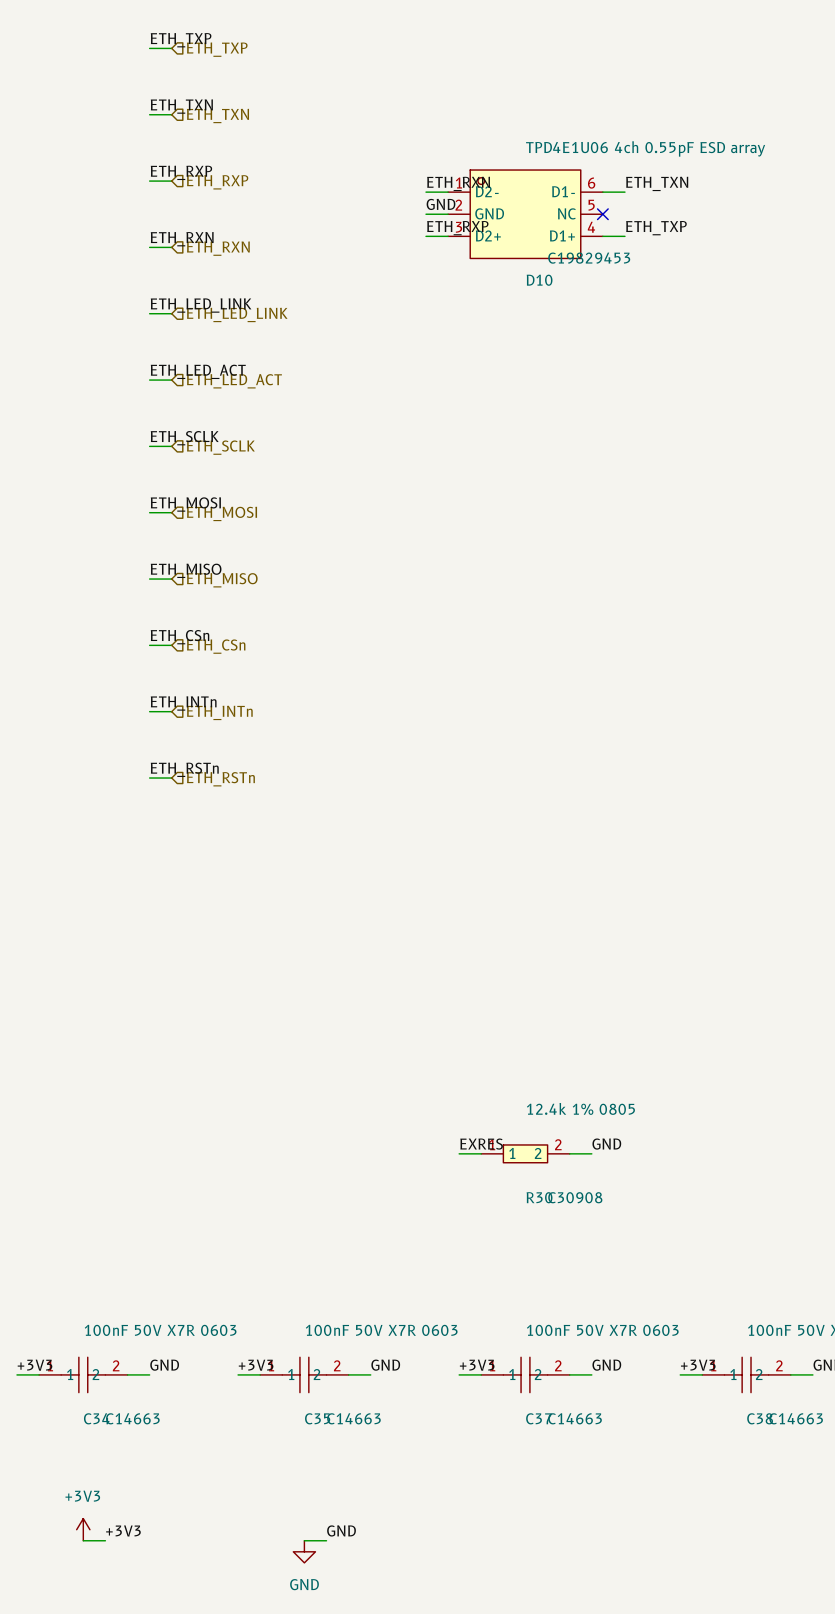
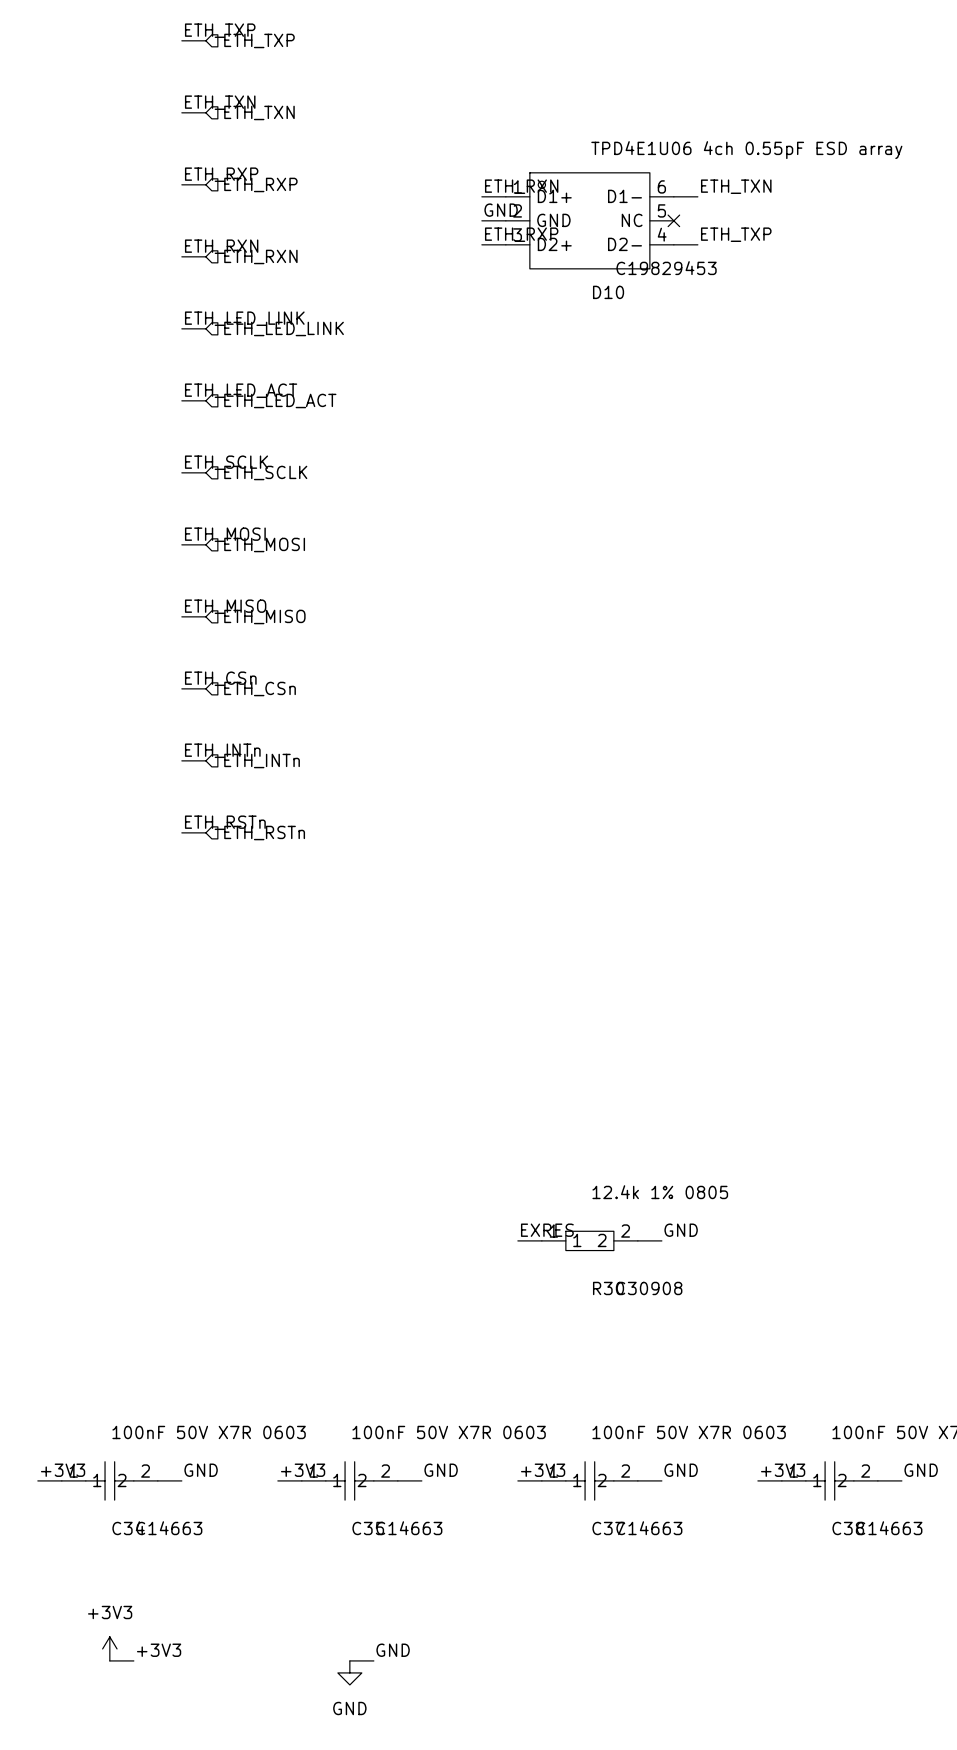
D10 pin name: D2- (487, 191) -> D1+ (554, 196)
D10 pin name: D1+ (562, 235) -> D2- (624, 244)

